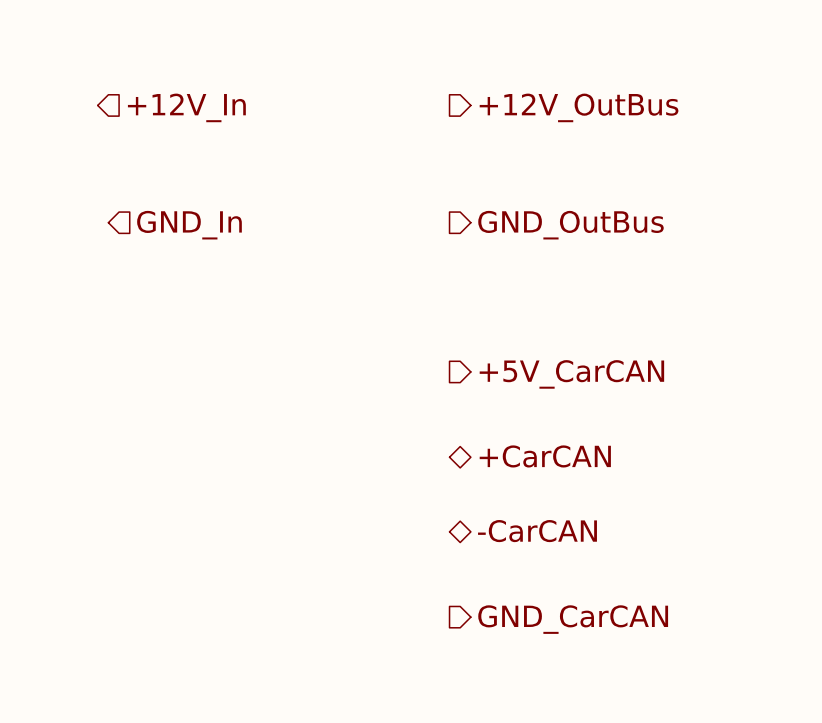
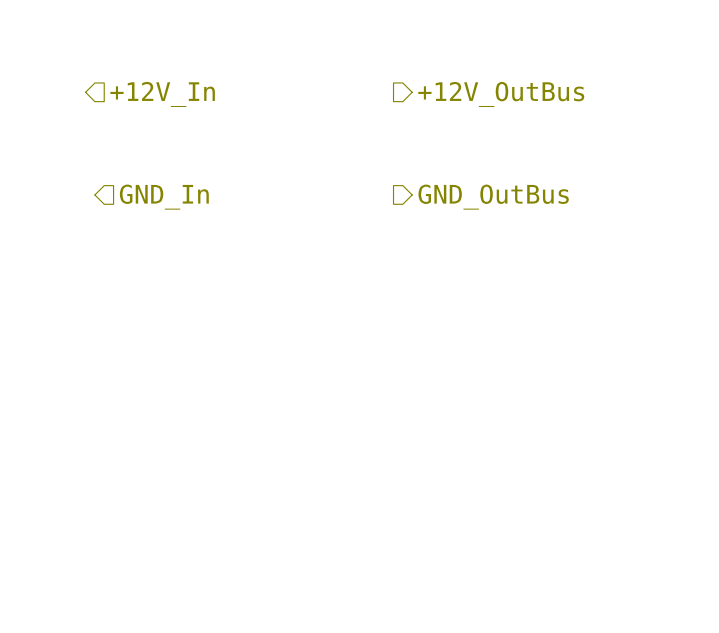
hierarchical label: +5V_CarCAN (571, 374) -> none
hierarchical label: +CarCAN (545, 456) -> none
hierarchical label: -CarCAN (537, 531) -> none
hierarchical label: GND_CarCAN (573, 619) -> none

